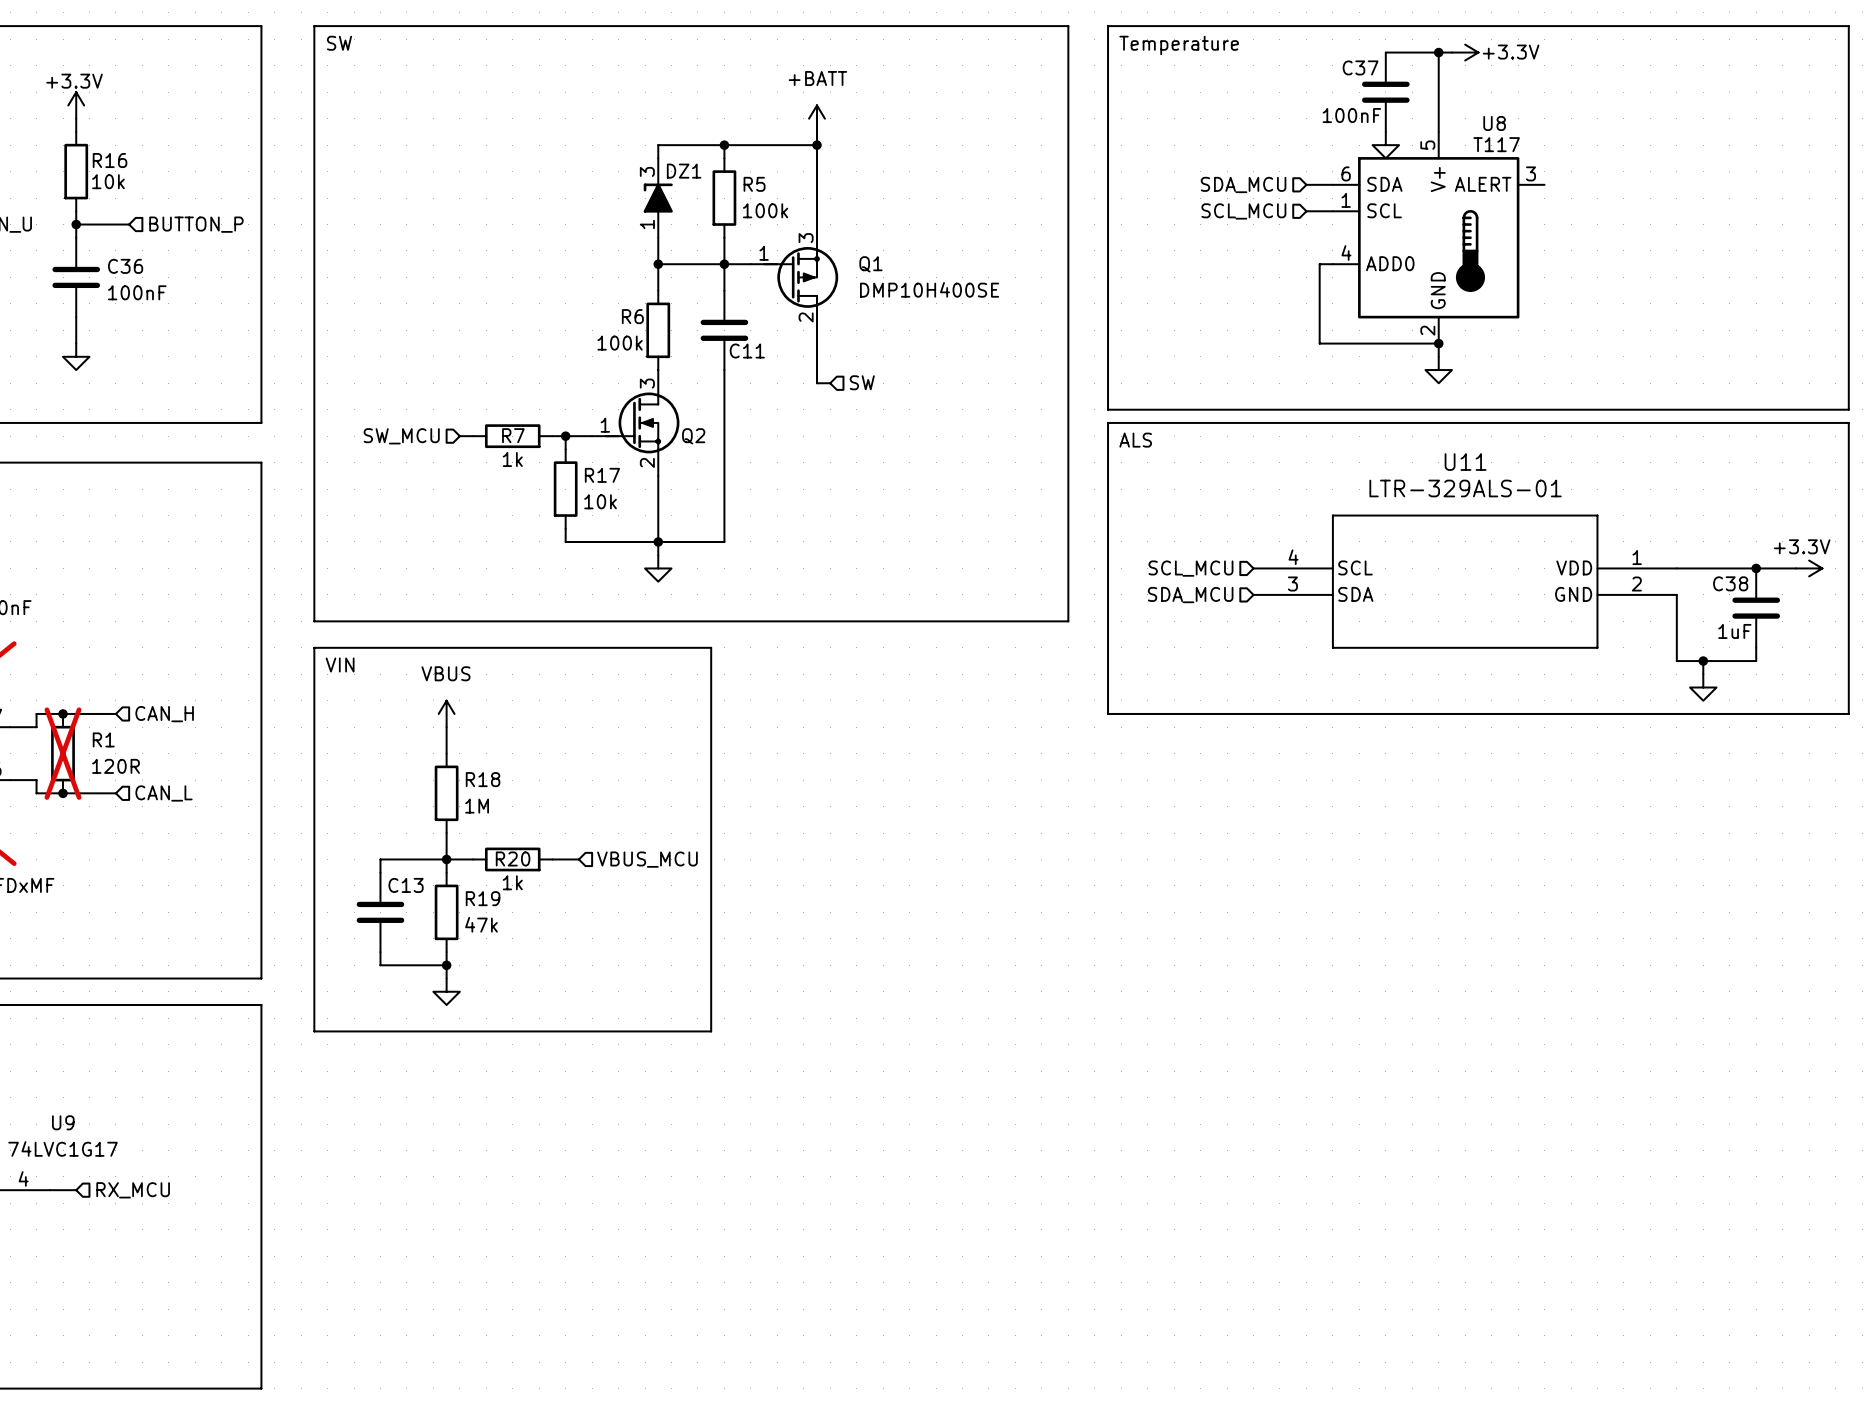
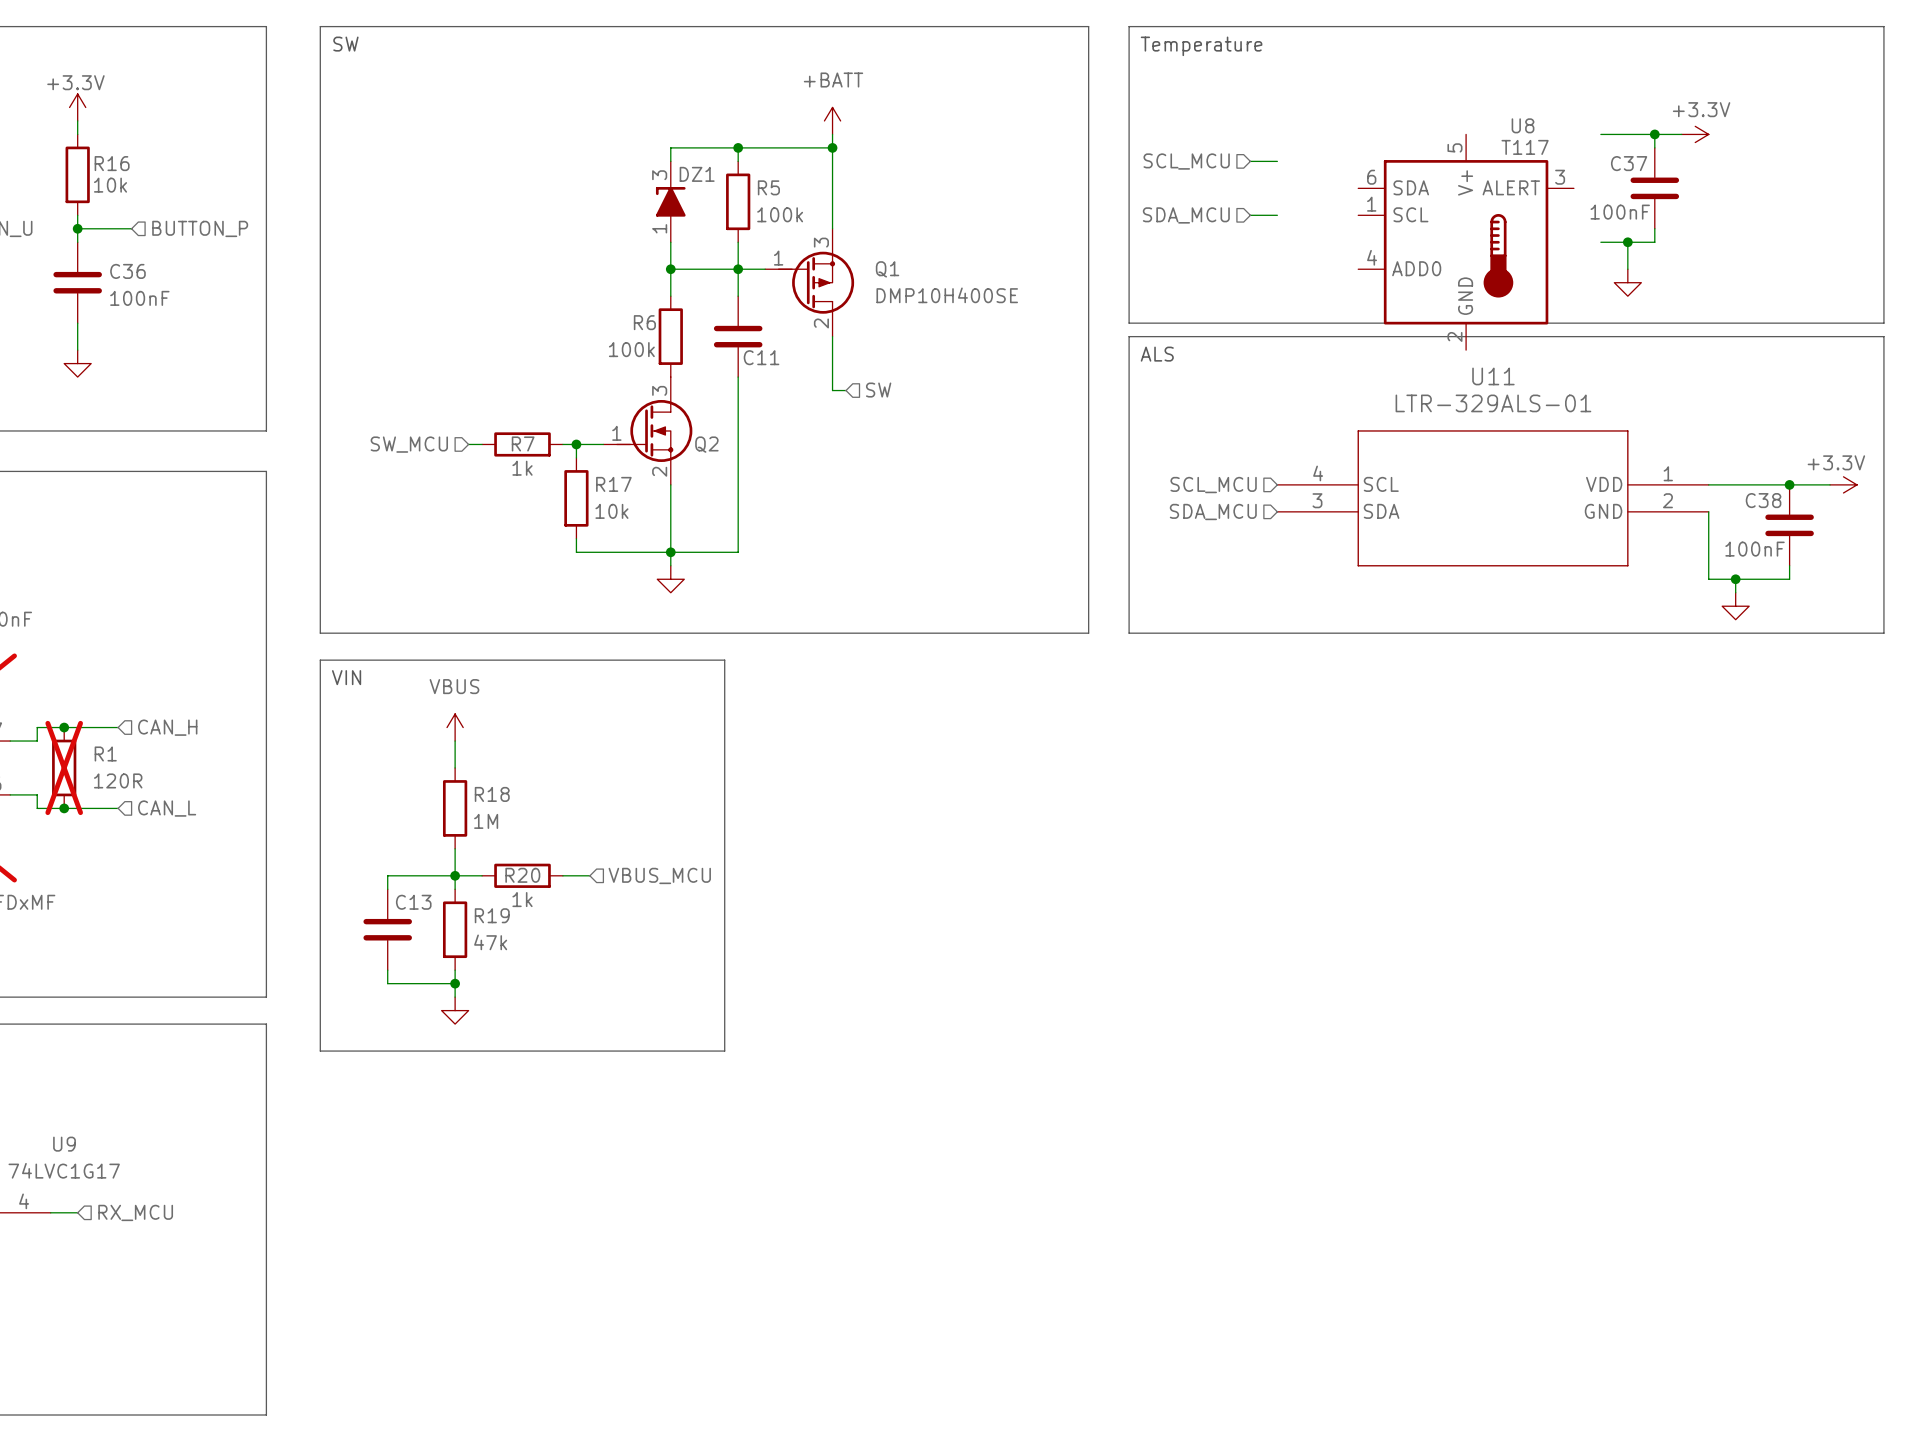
wire: (1385, 52) (1451, 52) -> none
wire: (1438, 52) (1438, 131) -> none
junction: (1438, 52) -> none
power symbol position: +3.3V (1465, 52) -> +3.3V (1695, 134)
power symbol text position: +3.3V (1511, 52) -> +3.3V (1701, 109)
C37 position: (1385, 92) -> (1654, 188)
wire: none -> (1600, 134) (1681, 134)
wire: none -> (1654, 134) (1654, 147)
junction: none -> (1654, 134)
power symbol: (1385, 145) -> none
hierarchical label position: SDA_MCU (1243, 184) -> SDA_MCU (1186, 215)
wire: (1306, 184) (1332, 184) -> (1250, 161) (1277, 161)
hierarchical label position: SCL_MCU (1243, 211) -> SCL_MCU (1186, 161)
wire: (1306, 211) (1332, 211) -> (1250, 215) (1277, 215)
wire: none -> (1654, 228) (1654, 242) (1600, 242)
wire: none -> (1627, 242) (1627, 269)
junction: none -> (1627, 242)
wire: (1332, 264) (1319, 264) (1319, 343) (1438, 343) (1438, 356) -> none
power symbol: none -> (1627, 282)
line: (1108, 317) (1108, 330) -> (1129, 323) (1883, 323)
line: (1848, 317) (1848, 330) -> (1129, 336) (1883, 336)
junction: (1438, 343) -> none
power symbol: (1438, 370) -> none
line: (1108, 409) (1848, 409) -> (1129, 417) (1129, 430)
line: (1108, 422) (1848, 422) -> (1883, 417) (1883, 430)
text position: ALS (1135, 440) -> ALS (1157, 354)
wire: none -> (1708, 484) (1830, 484)
junction: none -> (1789, 484)
wire: none -> (1708, 511) (1708, 579)
hierarchical label position: SCL_MCU (1190, 568) -> SCL_MCU (1213, 485)
junction: none -> (1735, 579)
wire: (1756, 568) (1795, 568) -> (1789, 579) (1789, 565)
junction: (1756, 568) -> none
power symbol position: +3.3V (1809, 568) -> +3.3V (1843, 484)
U11 position: (1465, 581) -> (1493, 498)
wire: (1676, 594) (1676, 661) (1756, 661) (1756, 647) -> none
hierarchical label position: SDA_MCU (1190, 595) -> SDA_MCU (1213, 512)
C38 position: (1756, 608) -> (1789, 525)
line: (1108, 621) (1108, 713) (1848, 713) (1848, 621) -> (1129, 633) (1883, 633)
C38 value: 1uF (1734, 631) -> 100nF (1755, 549)
wire: (1703, 661) (1703, 674) -> (1735, 579) (1735, 592)
junction: (1703, 661) -> none
power symbol position: (1703, 687) -> (1735, 606)

